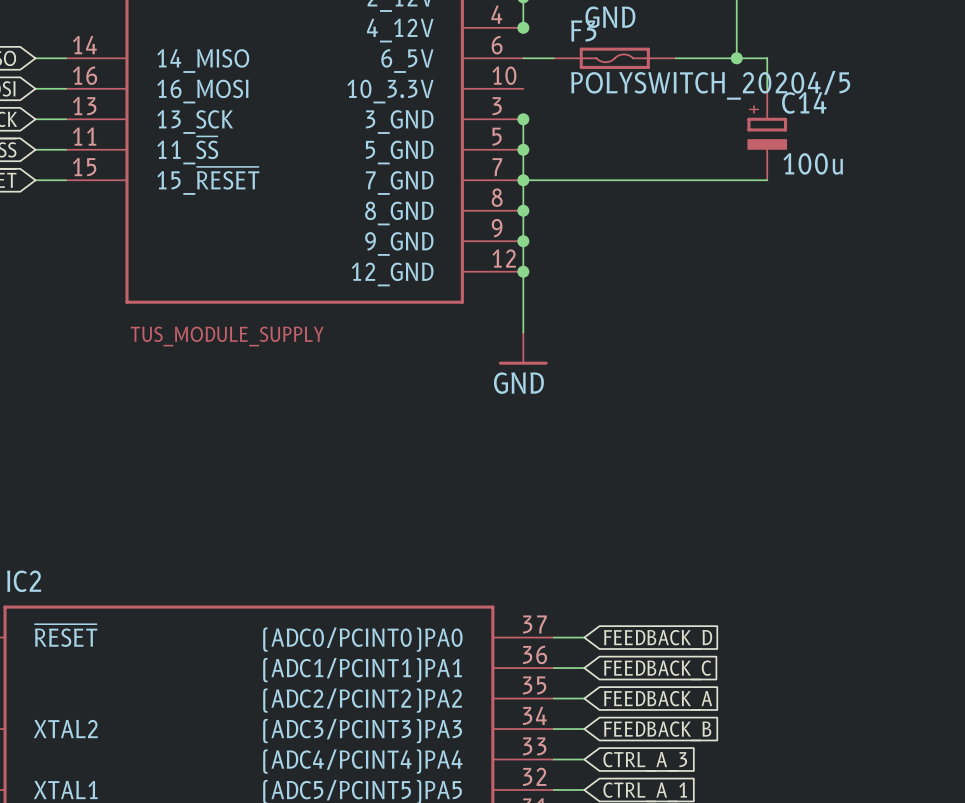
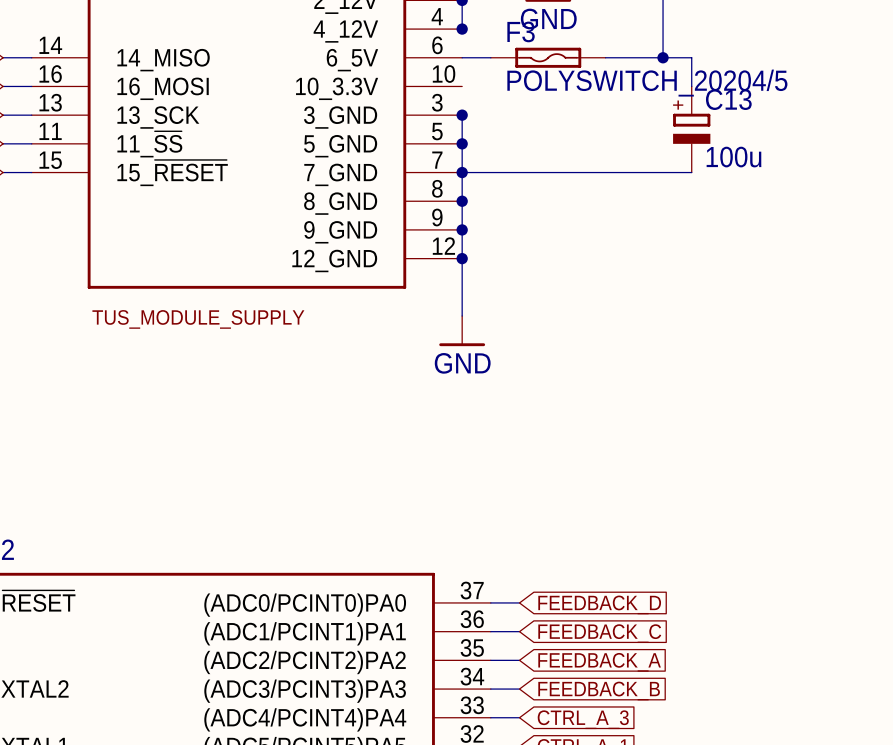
C14 name: C14 (804, 102) -> C13 (728, 99)

